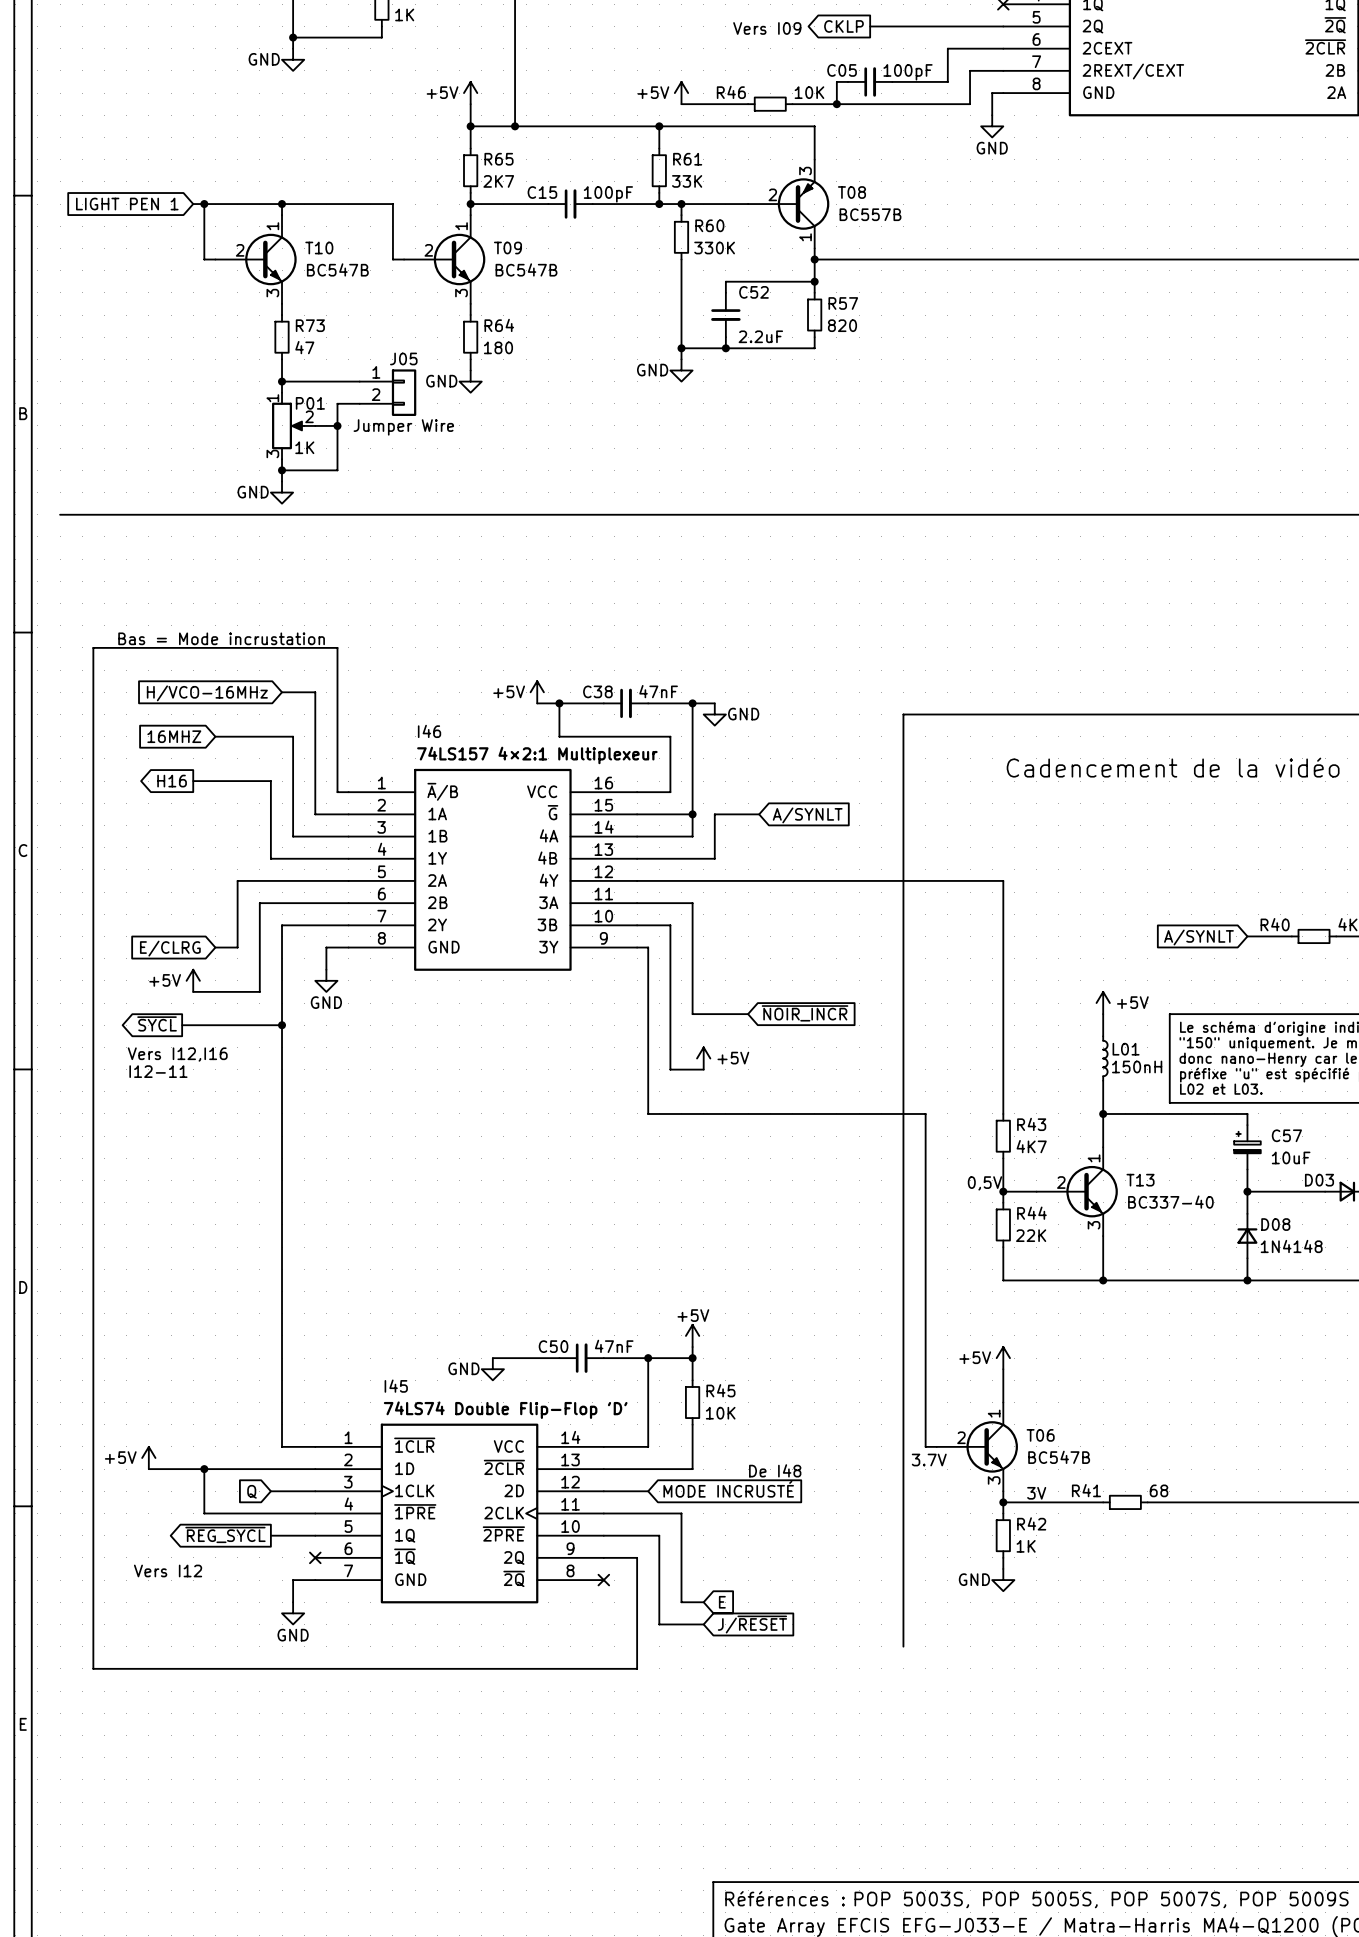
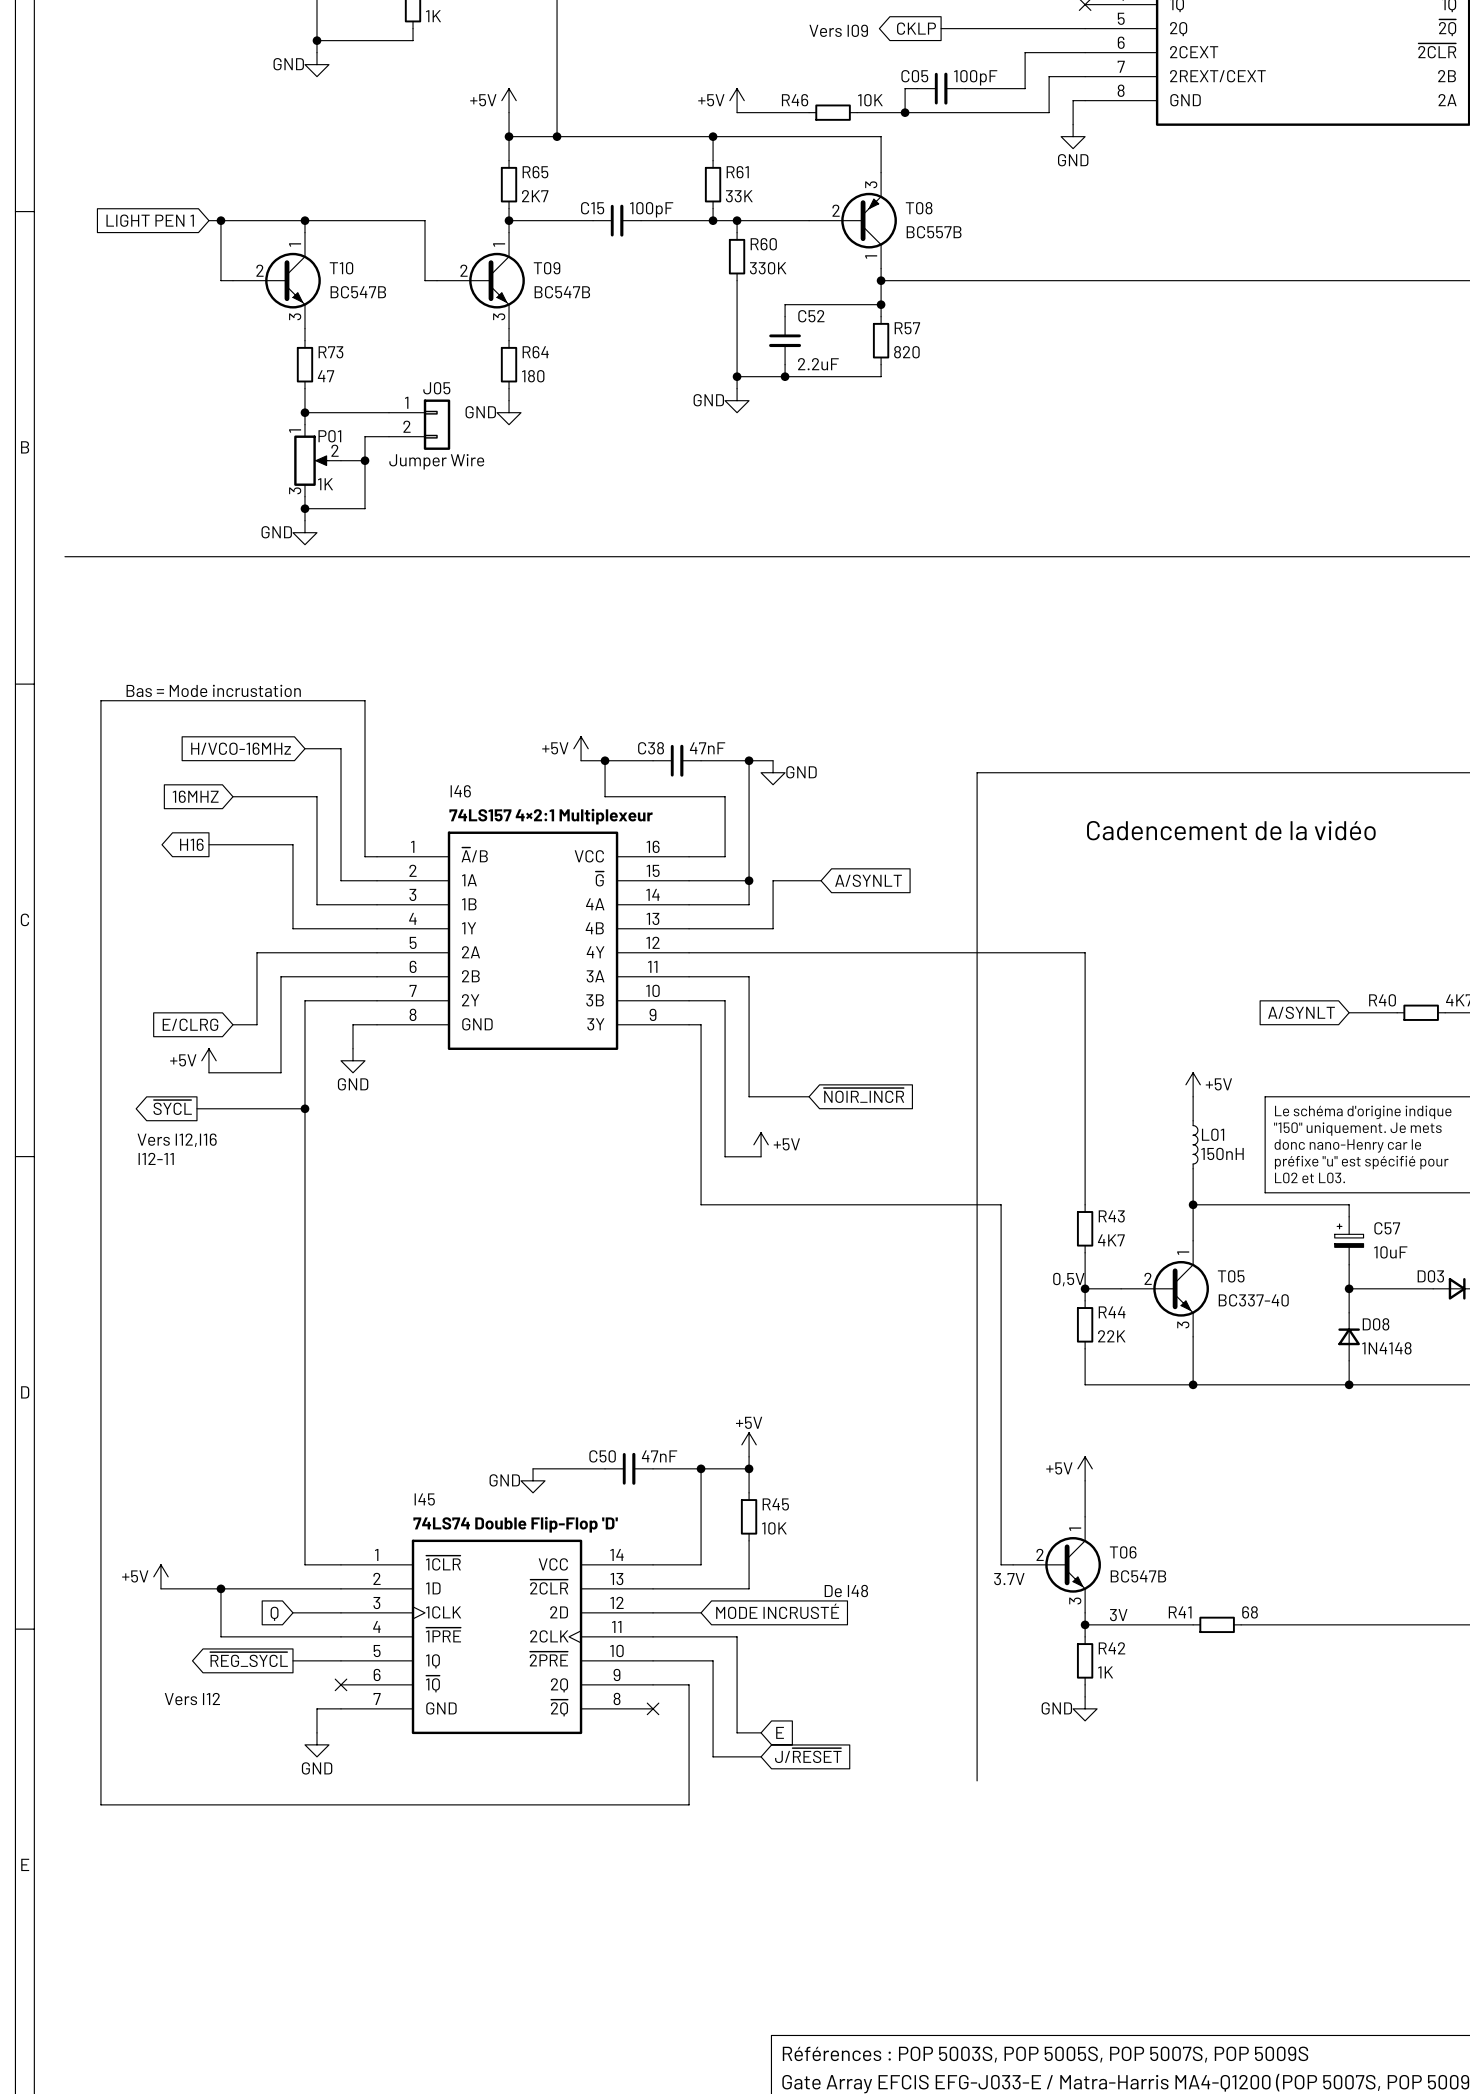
T13 name: T13 (1140, 1180) -> T05 (1231, 1276)

